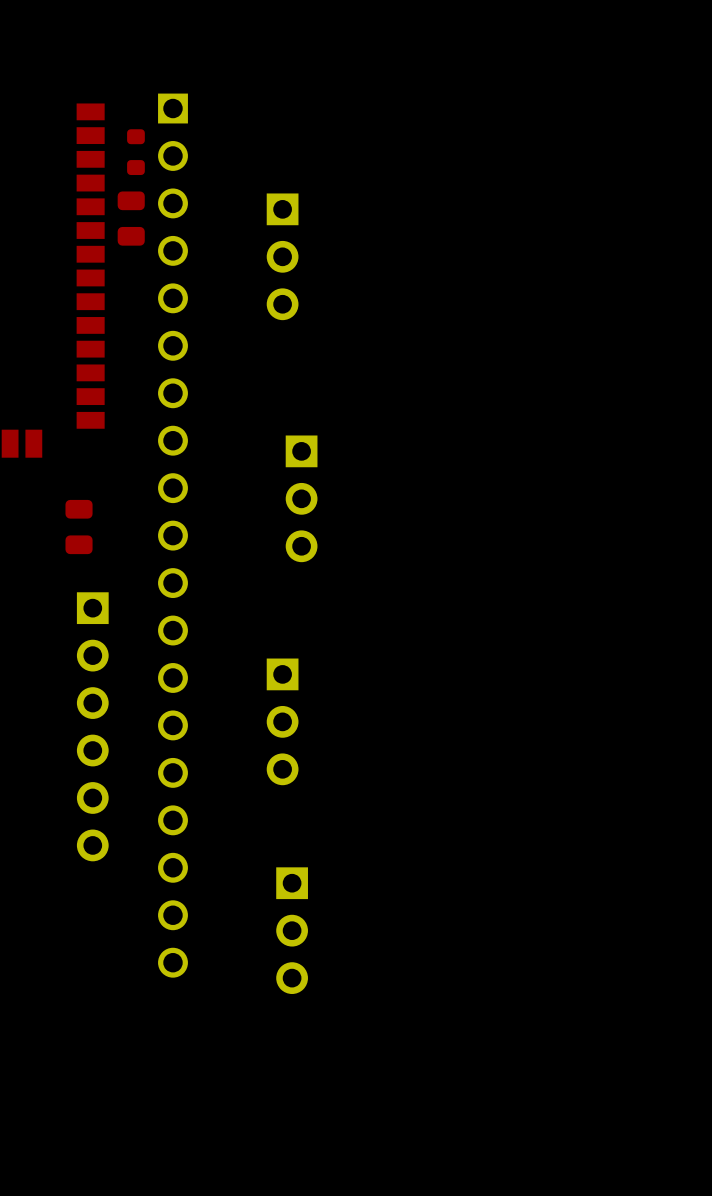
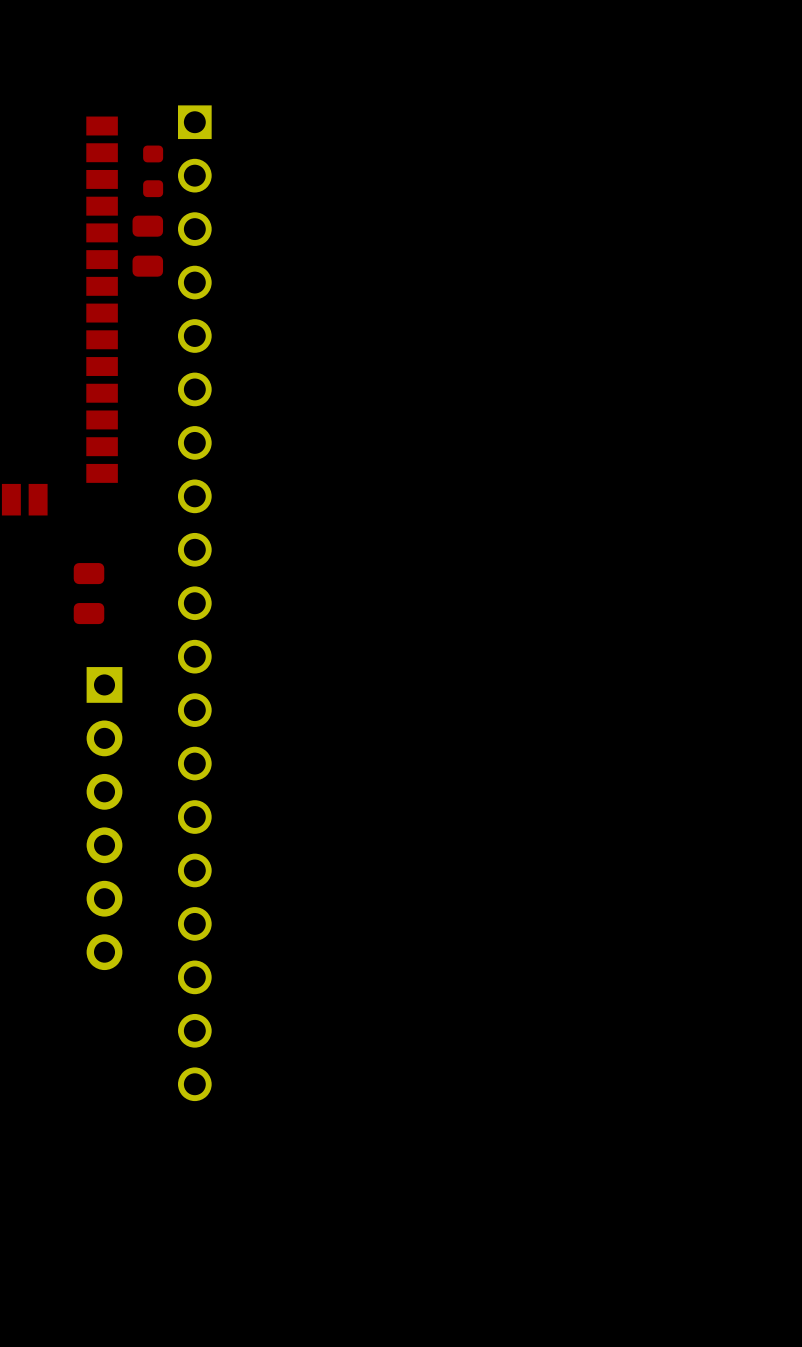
part: (282, 256) -> none
part: (301, 498) -> none
part: (282, 721) -> none
part: (292, 930) -> none

